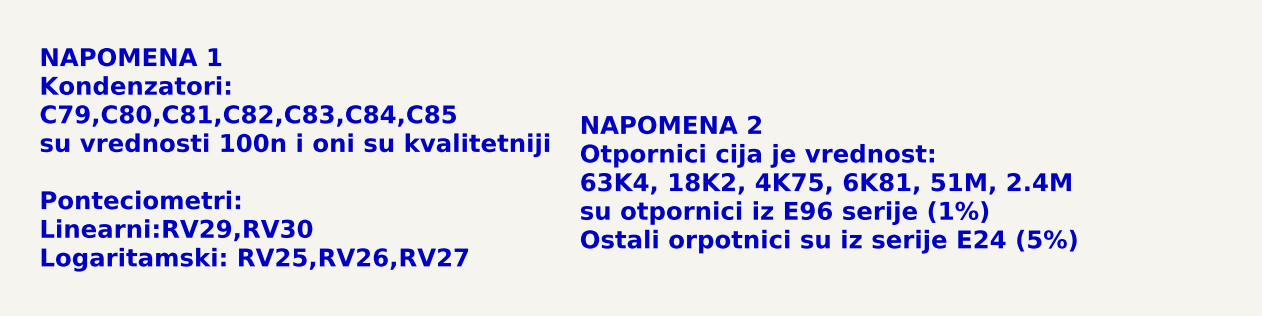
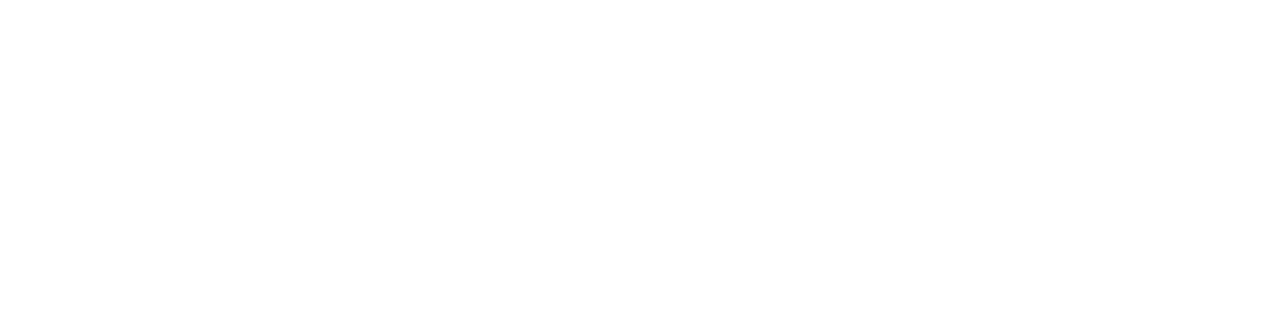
text: NAPOMENA 1 (131, 57) -> none
text: Kondenzatori: (135, 85) -> none
text: C79,C80,C81,C82,C83,C84,C85 (248, 115) -> none
text: NAPOMENA 2 (671, 124) -> none
text: su vrednosti 100n i oni su kvalitetniji (294, 145) -> none
text: Otpornici cija je vrednost: (757, 155) -> none
text: 63K4, 18K2, 4K75, 6K81, 51M, 2.4M (826, 183) -> none
text: Ponteciometri: (140, 200) -> none
text: su otpornici iz E96 serije (1%) (784, 213) -> none
text: Linearni:RV29,RV30 (177, 230) -> none
text: Ostali orpotnici su iz serije E24 (5%) (828, 241) -> none
text: Logaritamski: RV25,RV26,RV27 (254, 259) -> none

